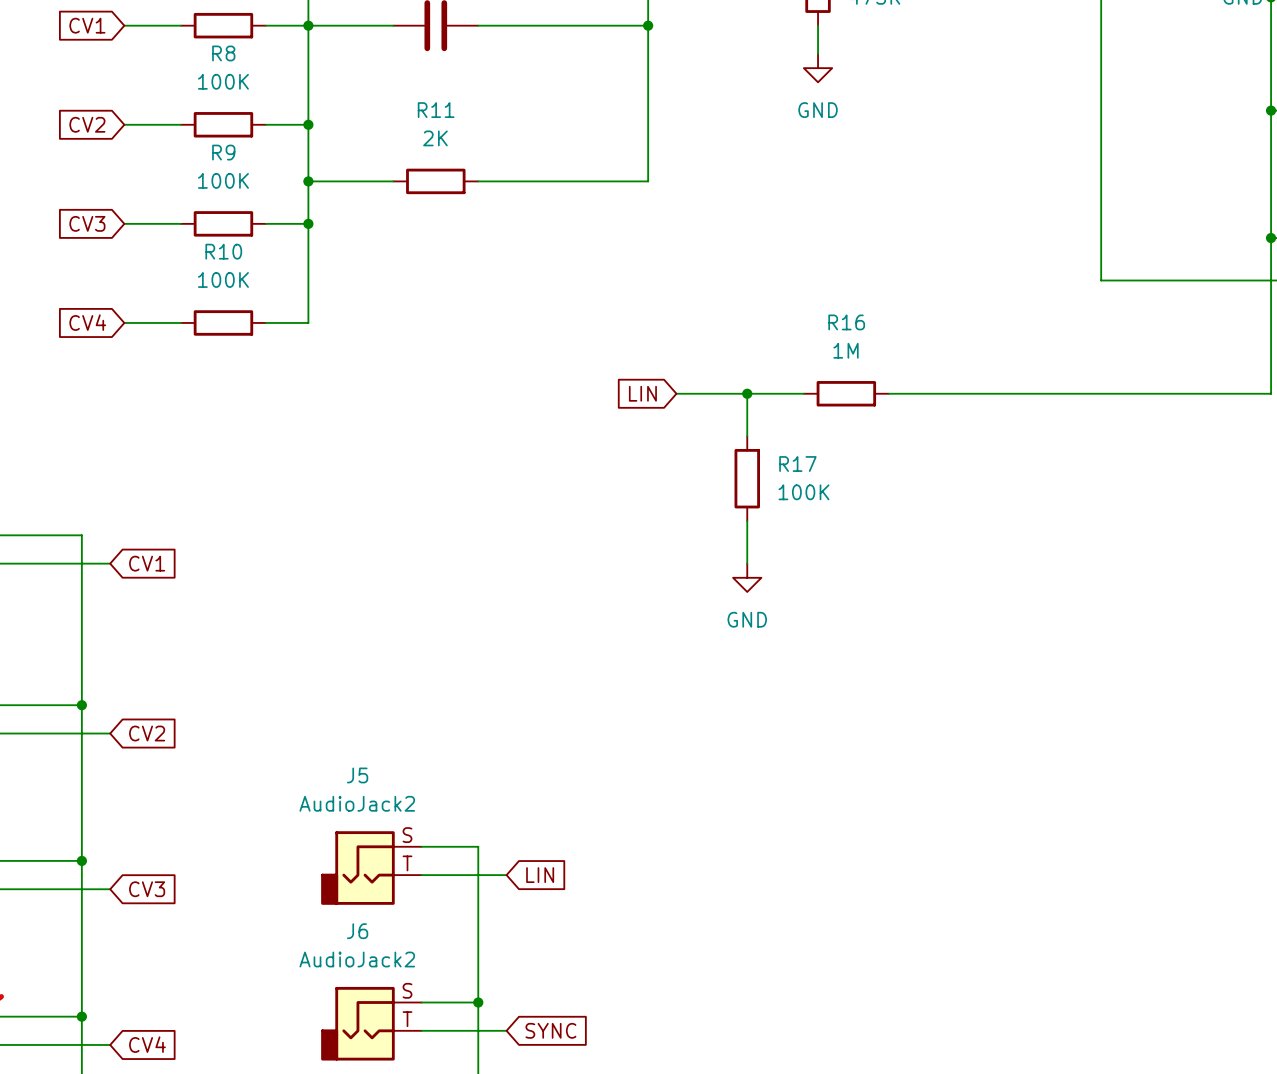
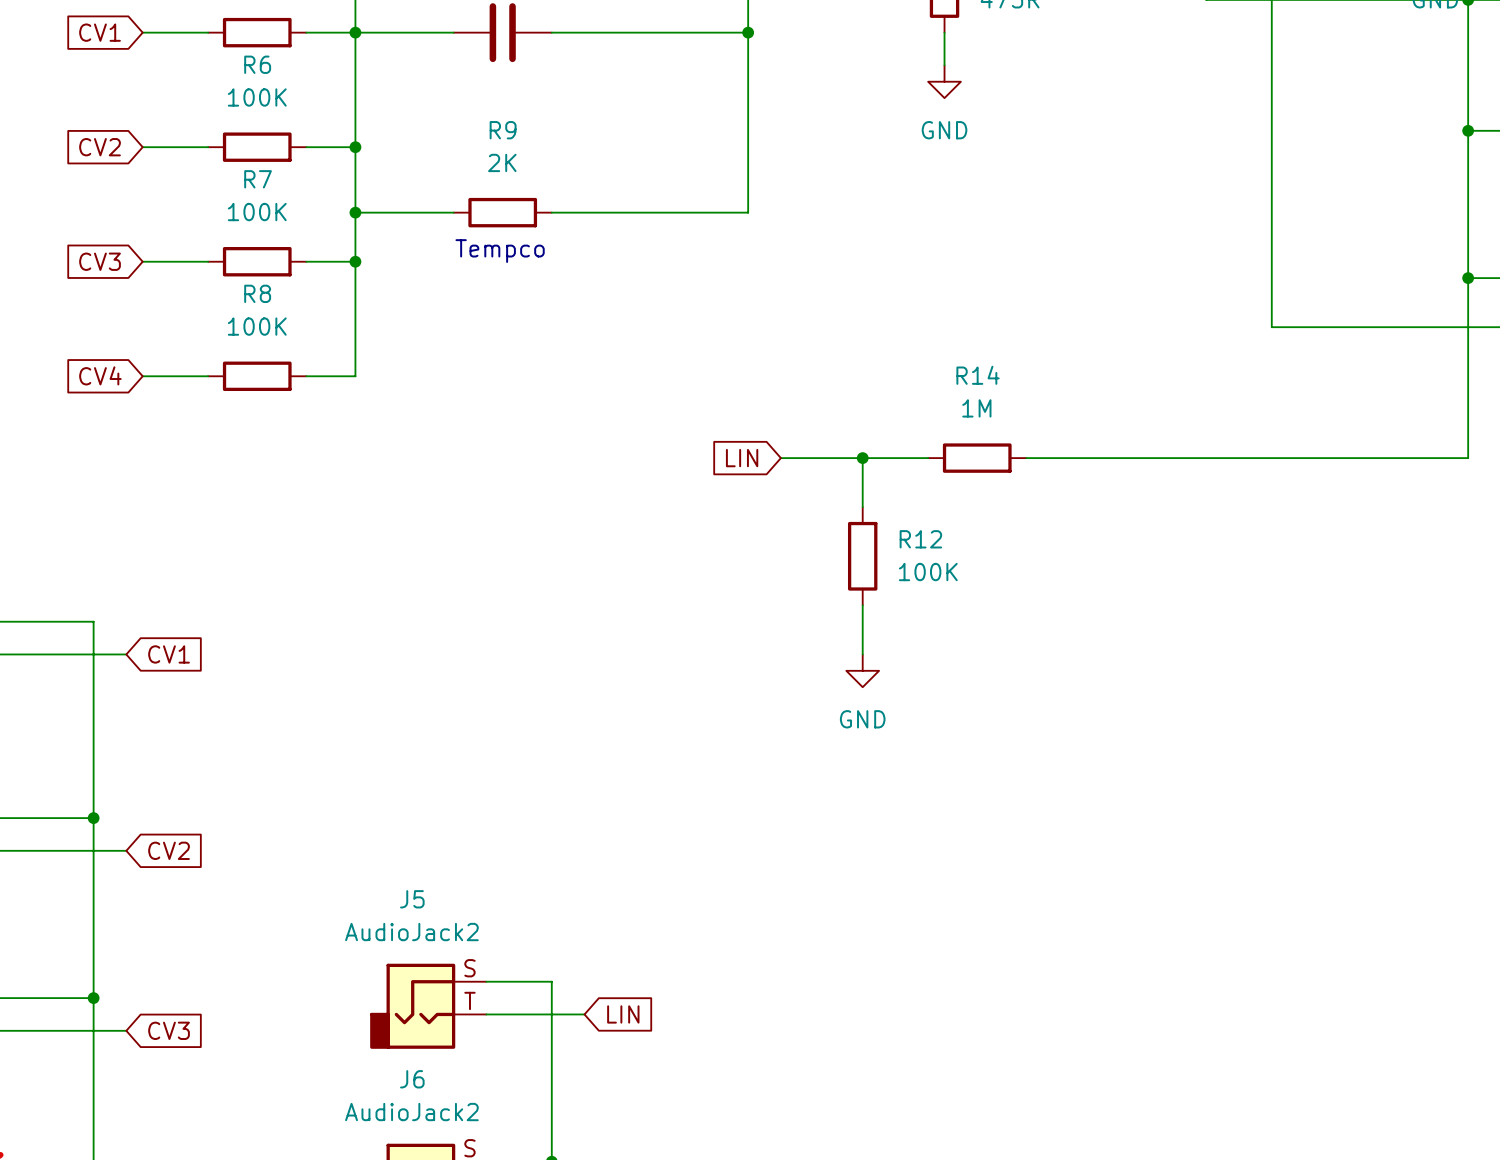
R8 name: R8 (223, 53) -> R6 (257, 64)
R11 name: R11 (436, 110) -> R9 (503, 130)
R9 name: R9 (223, 152) -> R7 (258, 179)
text: none -> Tempco (500, 251)
R10 name: R10 (223, 251) -> R8 (257, 293)
R16 name: R16 (846, 322) -> R14 (978, 375)
R17 name: R17 (797, 464) -> R12 (920, 539)

